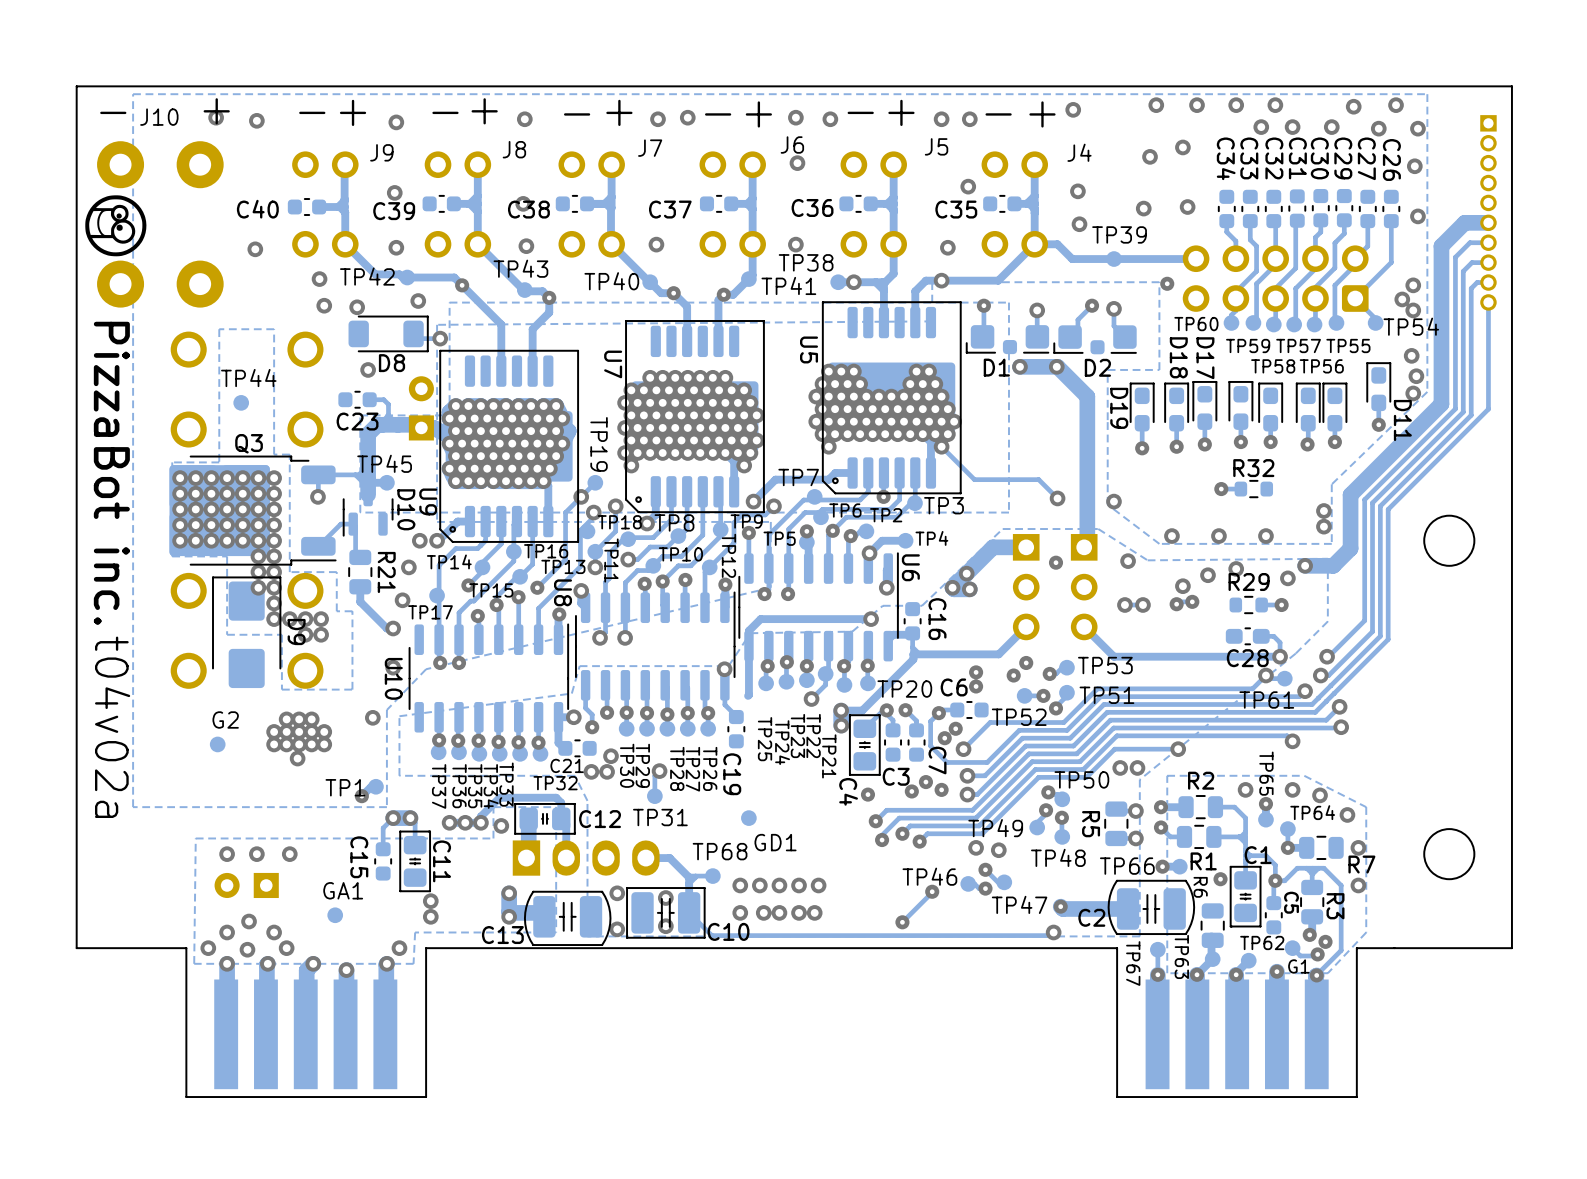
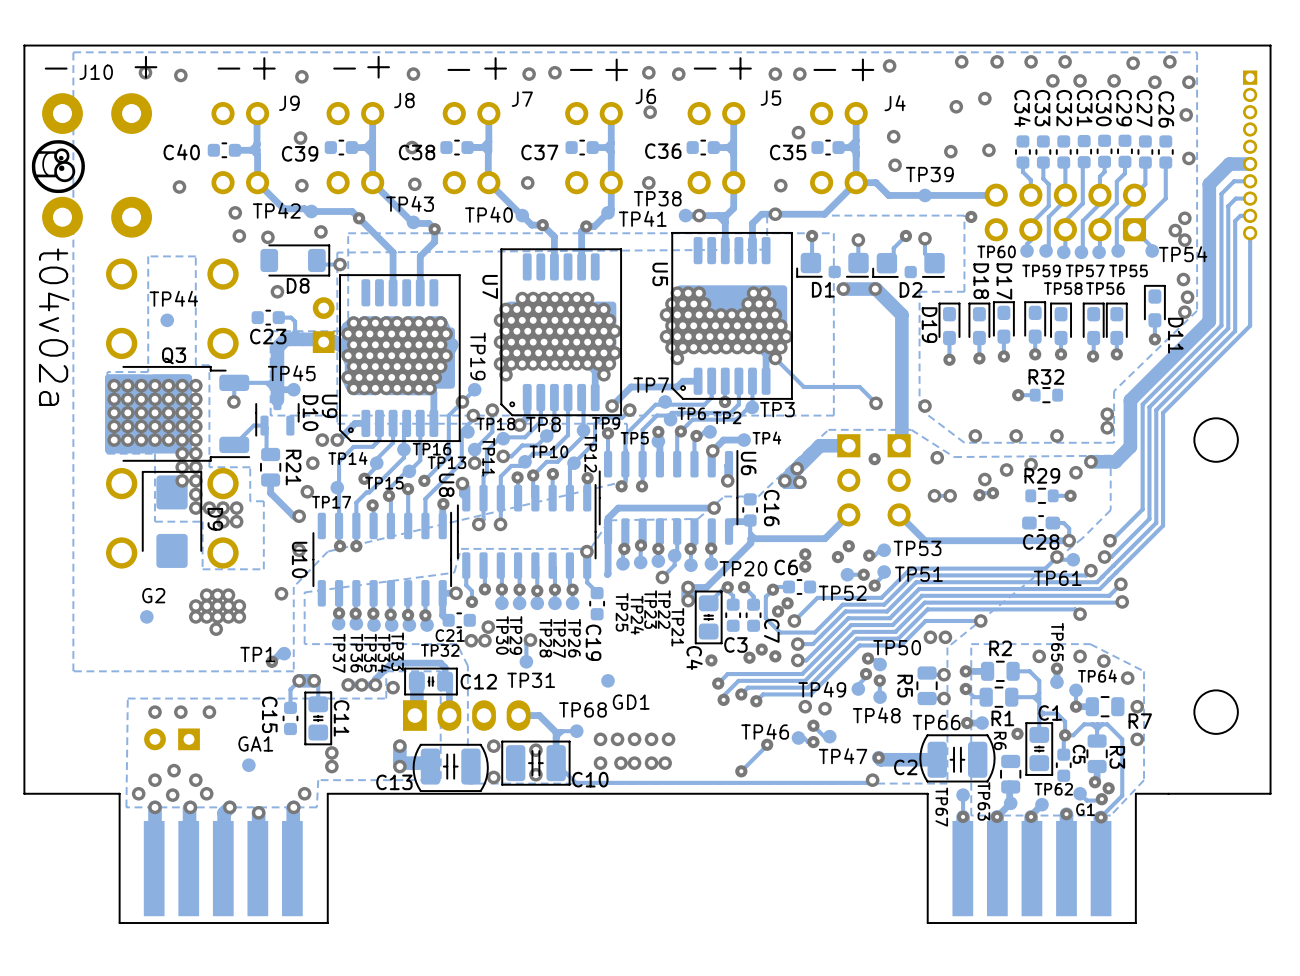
text: PizzaBot inc. (111, 473) -> t04v02a (54, 327)
text: t04v02a (112, 727) -> none

